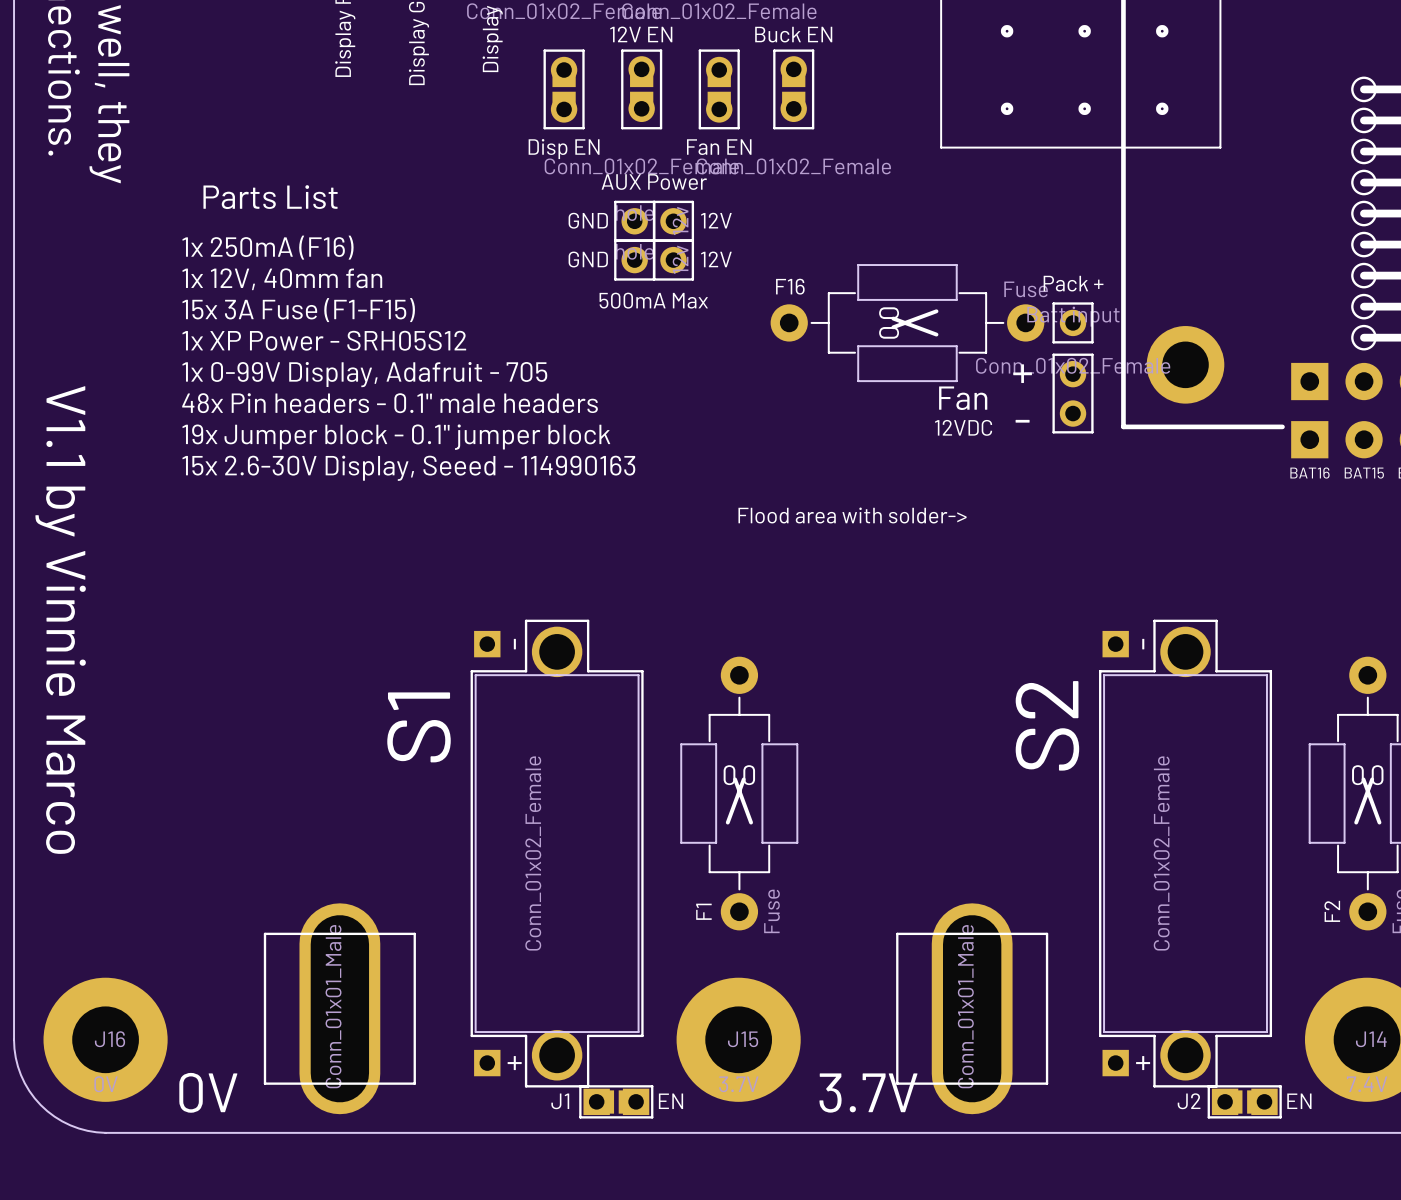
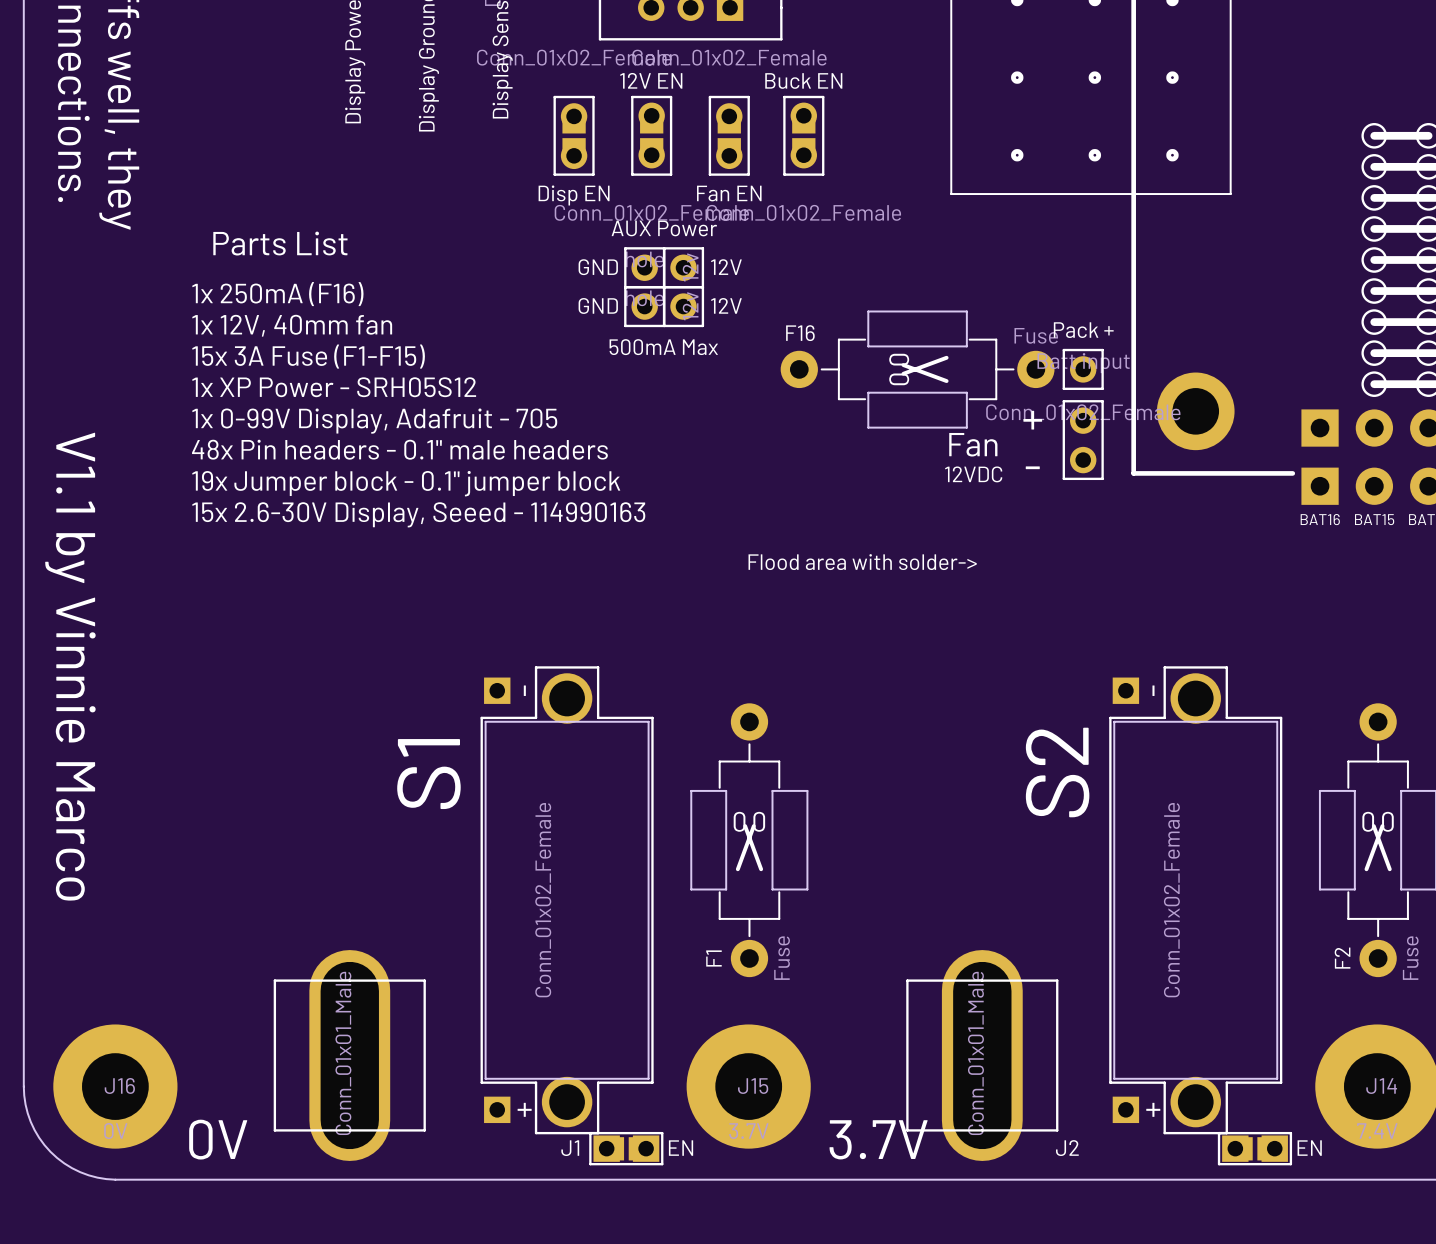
text position: J2 (1189, 1101) -> J2 (1067, 1148)

